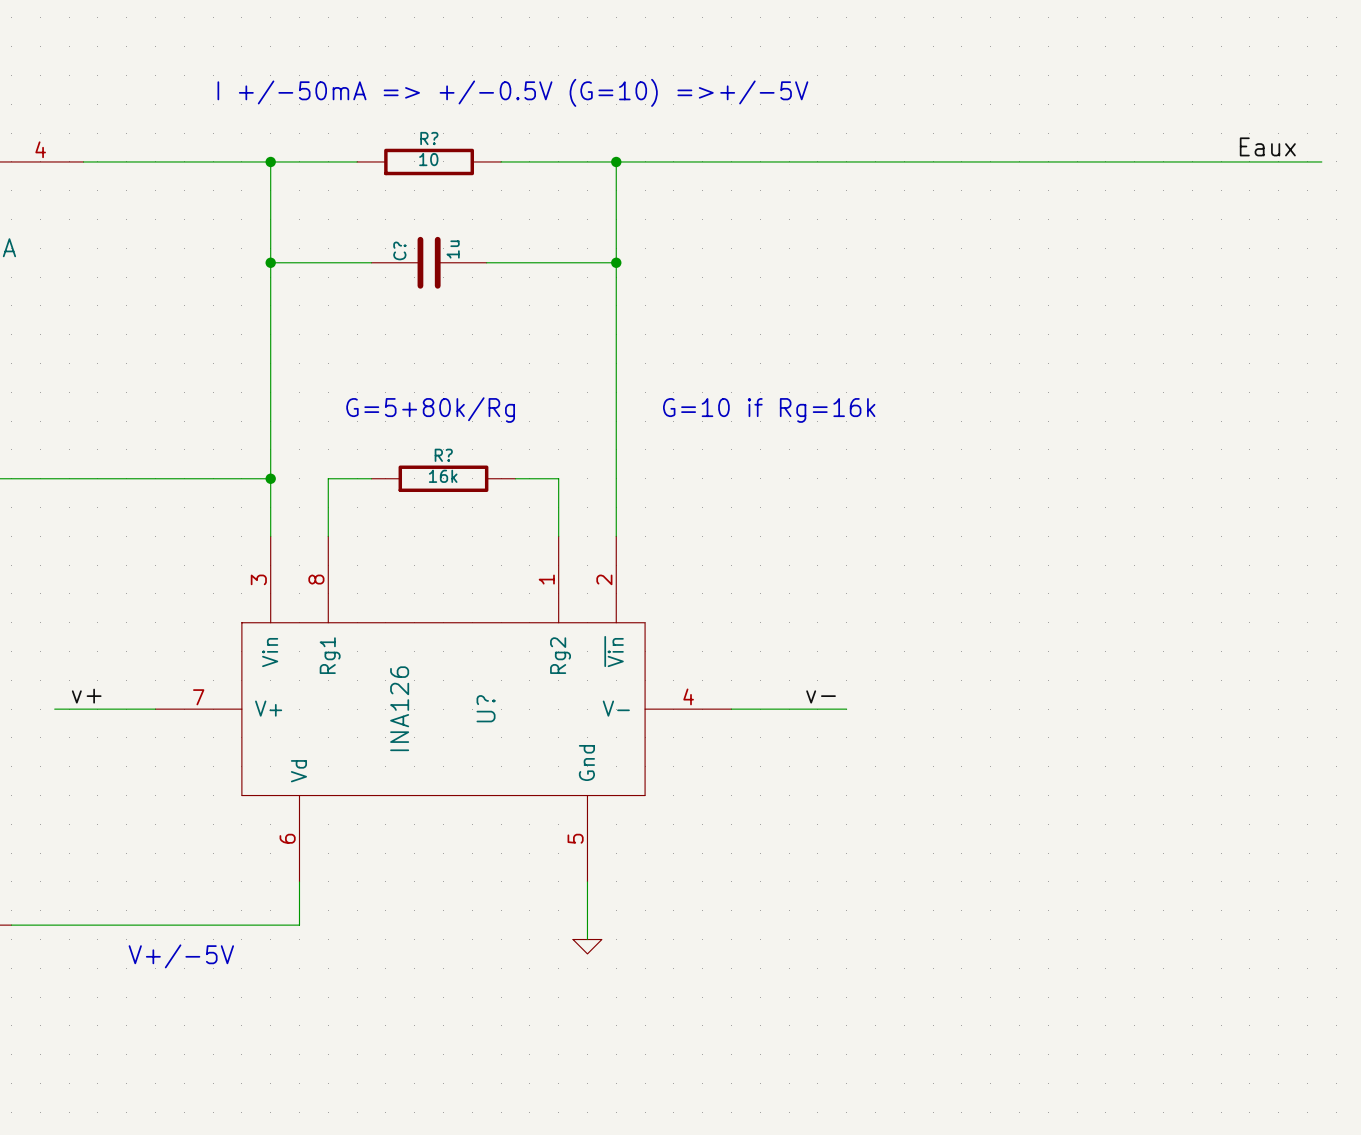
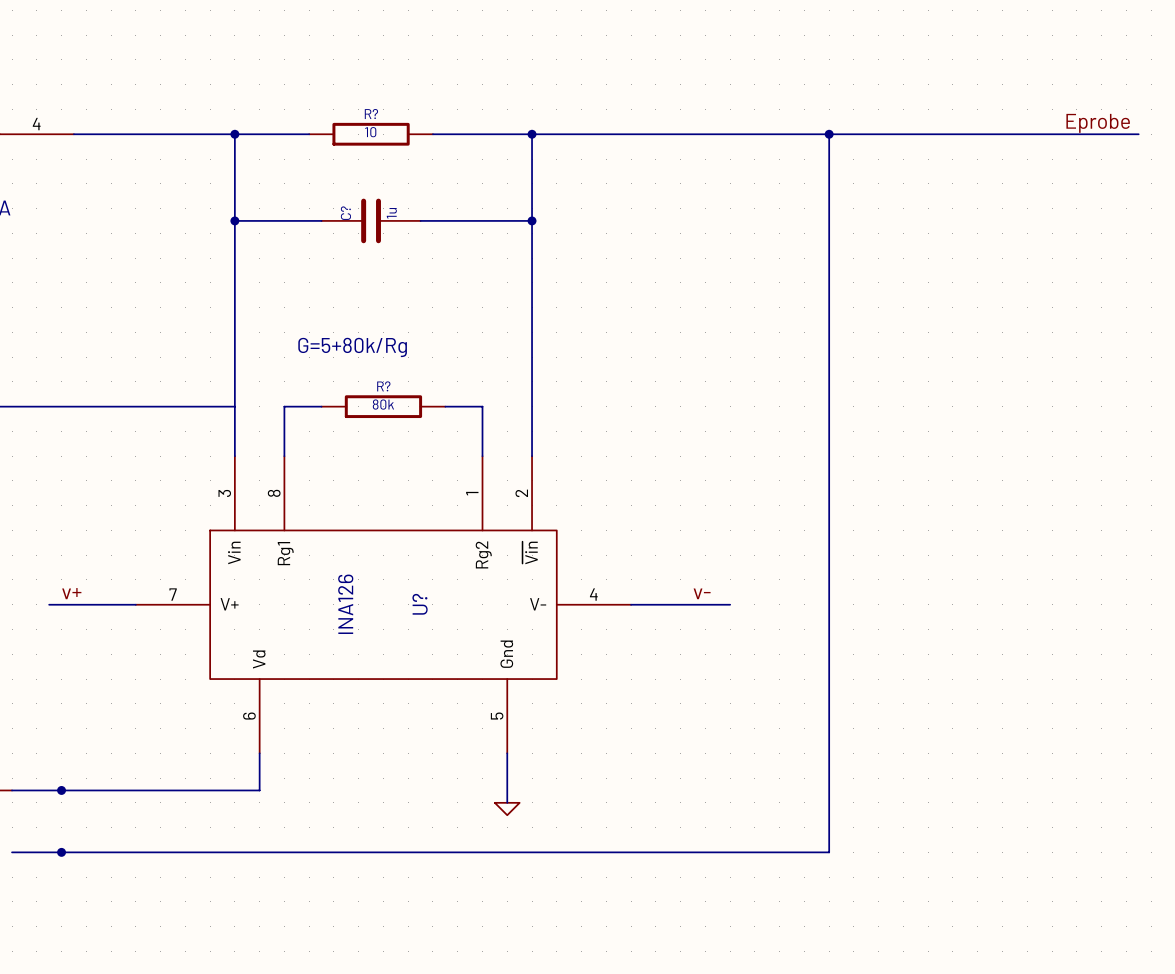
text: I +/-50mA => +/-0.5V (G=10) =>+/-5V (512, 92) -> none
label: Eaux (1267, 146) -> Eprobe (1098, 123)
wire: none -> (829, 134) (829, 852) (12, 852)
junction: none -> (829, 134)
text: G=10 if Rg=16k (769, 410) -> none
R? value: 16k (443, 476) -> 80k (383, 404)
junction: (270, 478) -> none
junction: none -> (61, 790)
text: V+/-5V (181, 956) -> none
junction: none -> (61, 852)

